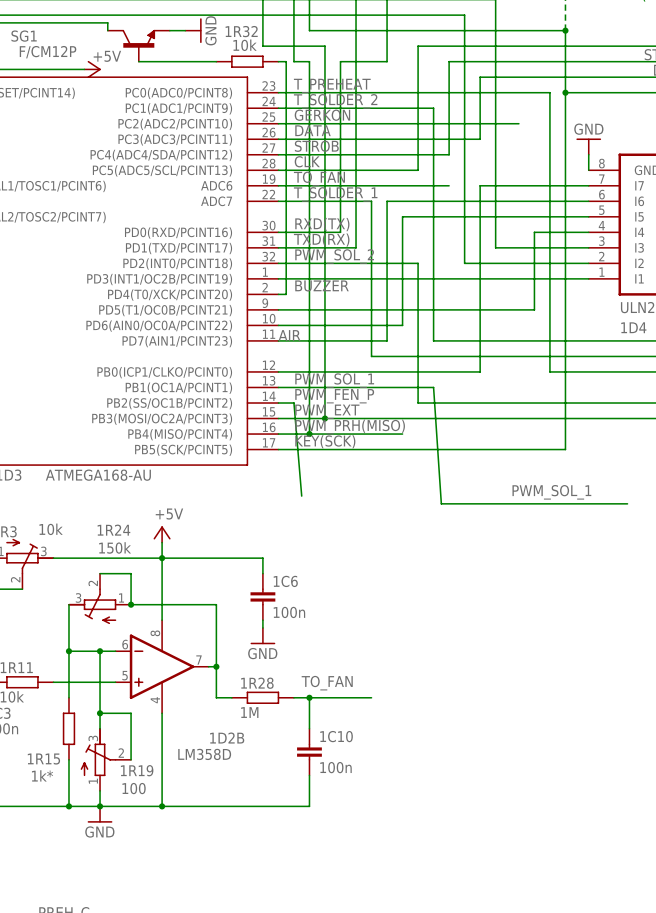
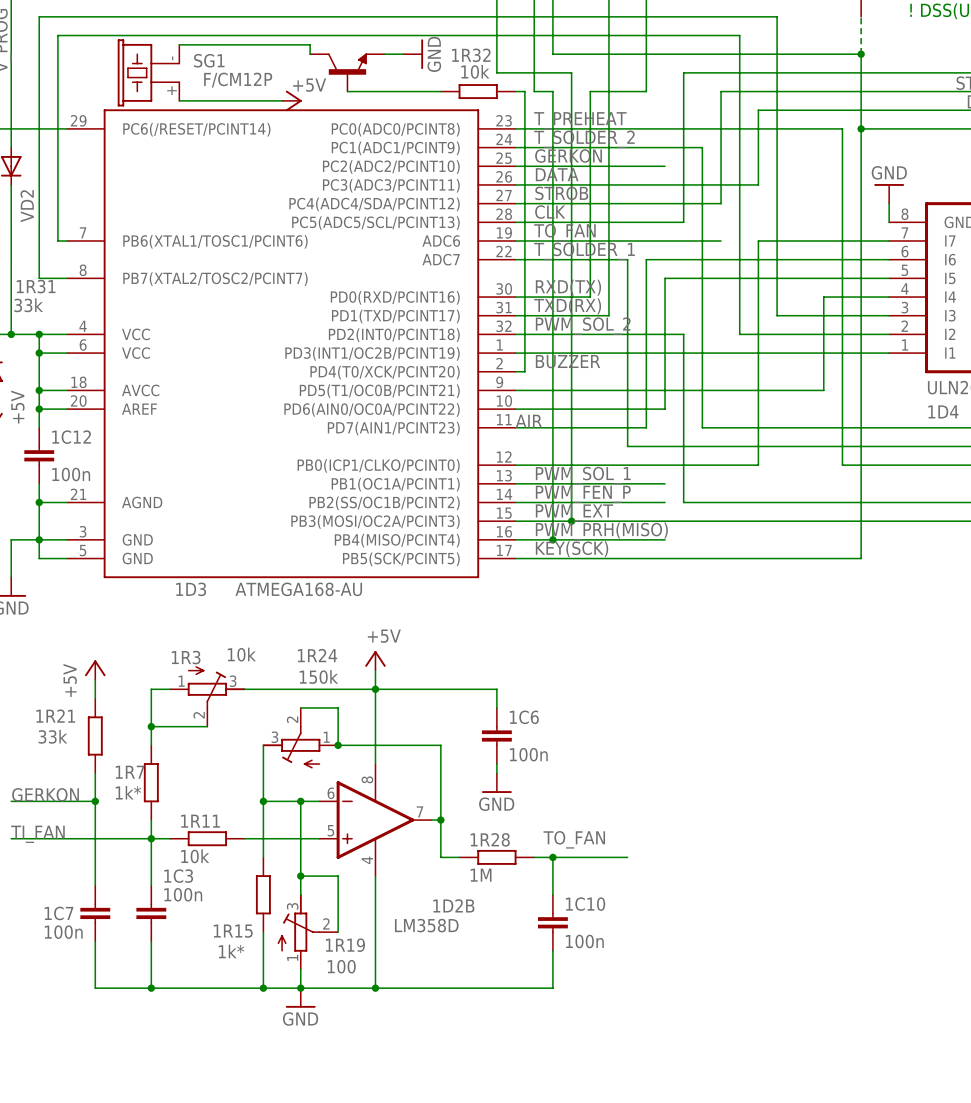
wire: (402, 123) (518, 123) -> none
wire: (402, 387) (433, 387) (441, 503) (627, 503) -> none
wire: (293, 403) (301, 496) -> (534, 502) (665, 502)
label: PWM_SOL_1 (551, 492) -> none

